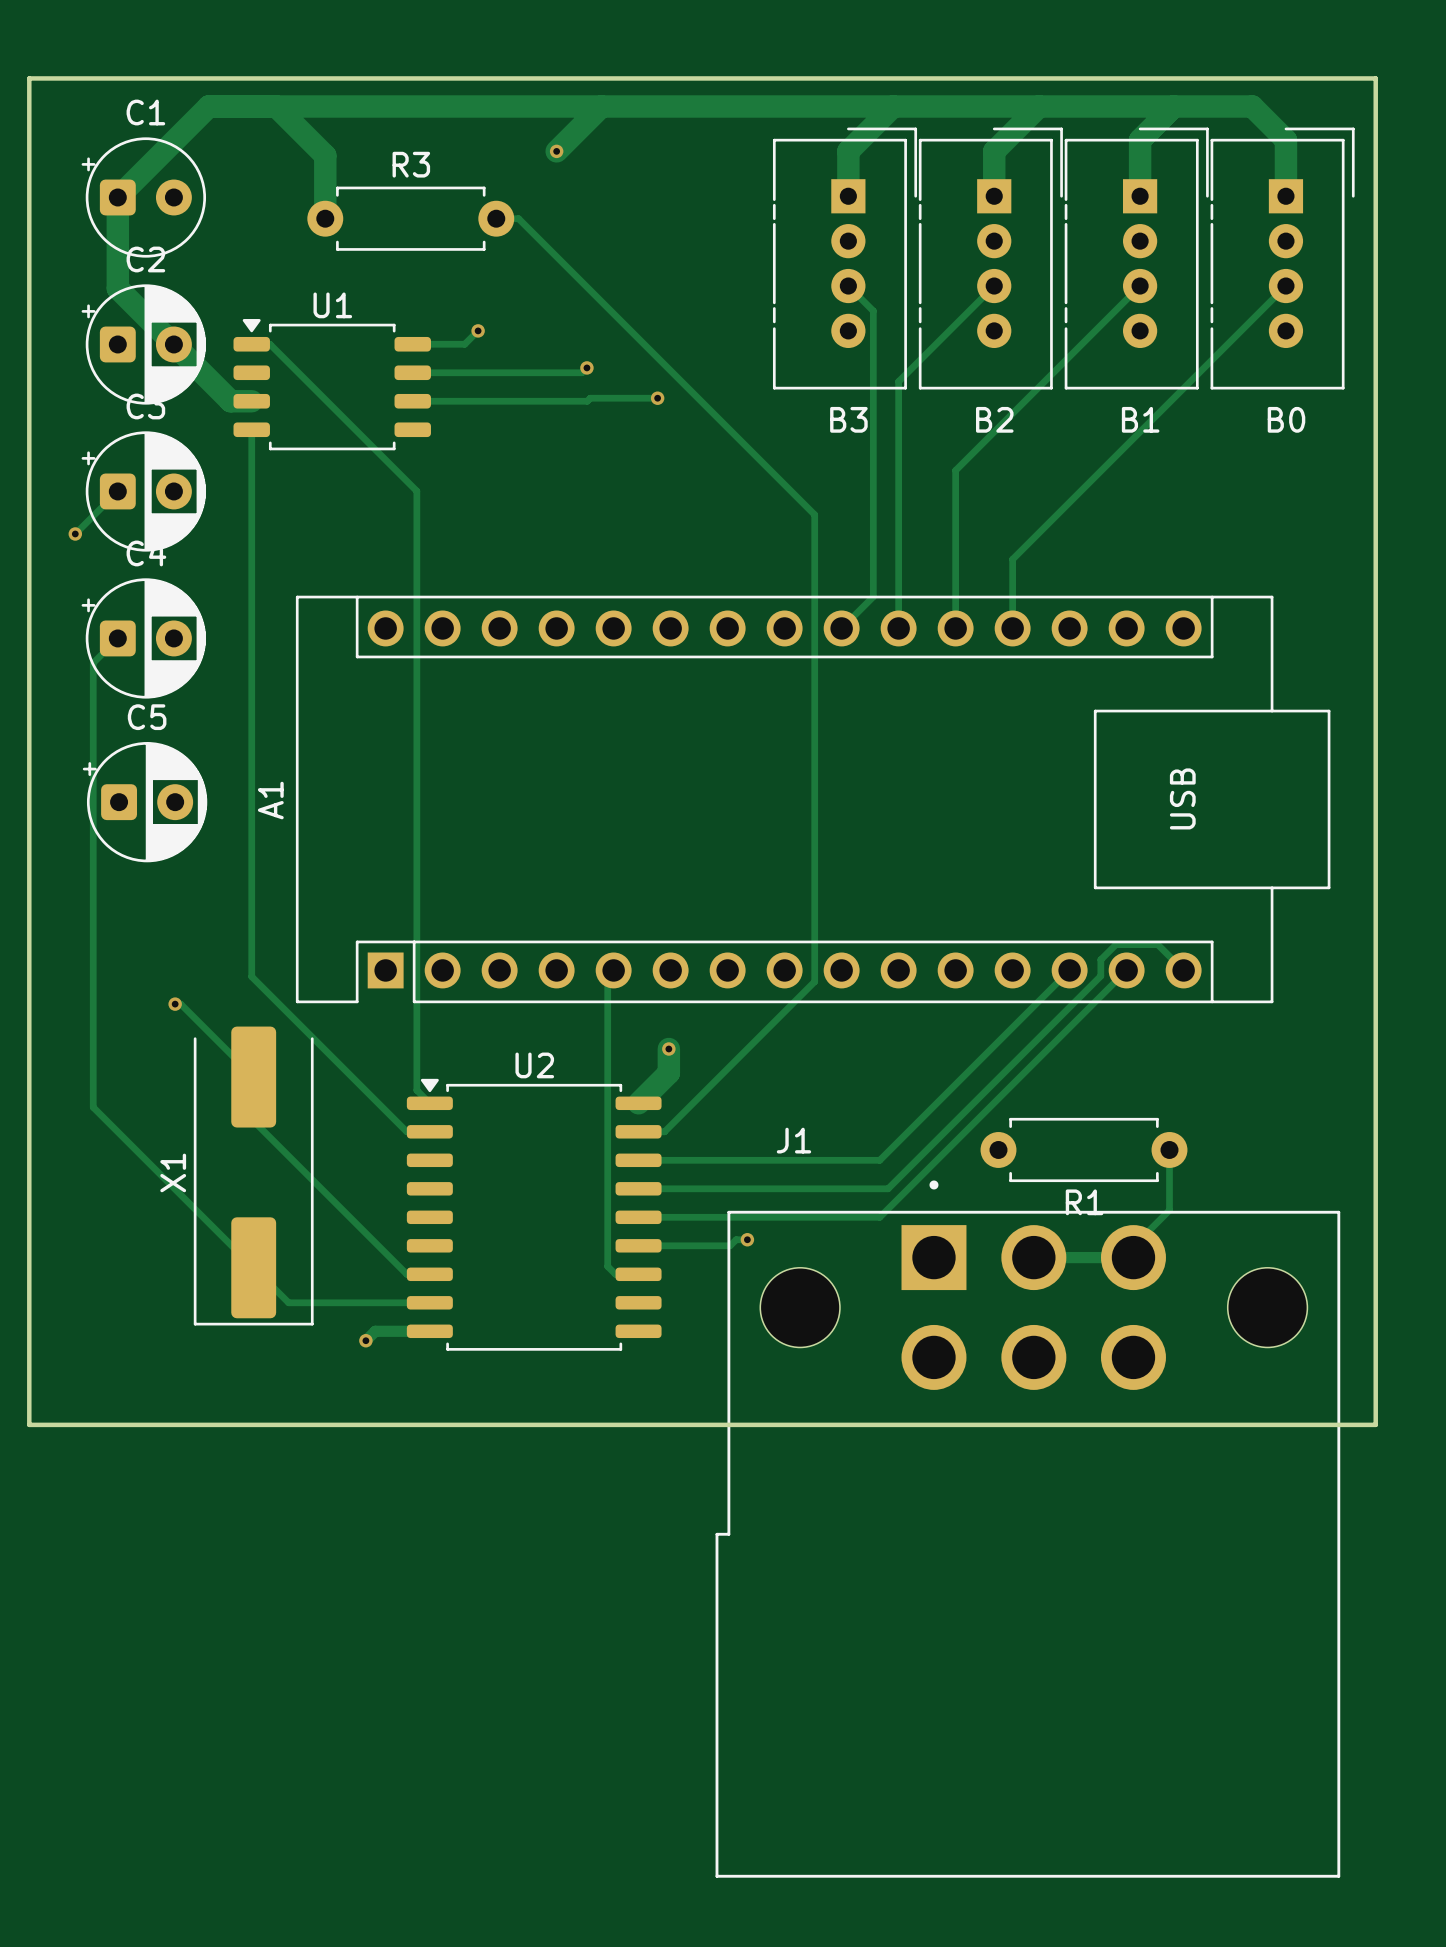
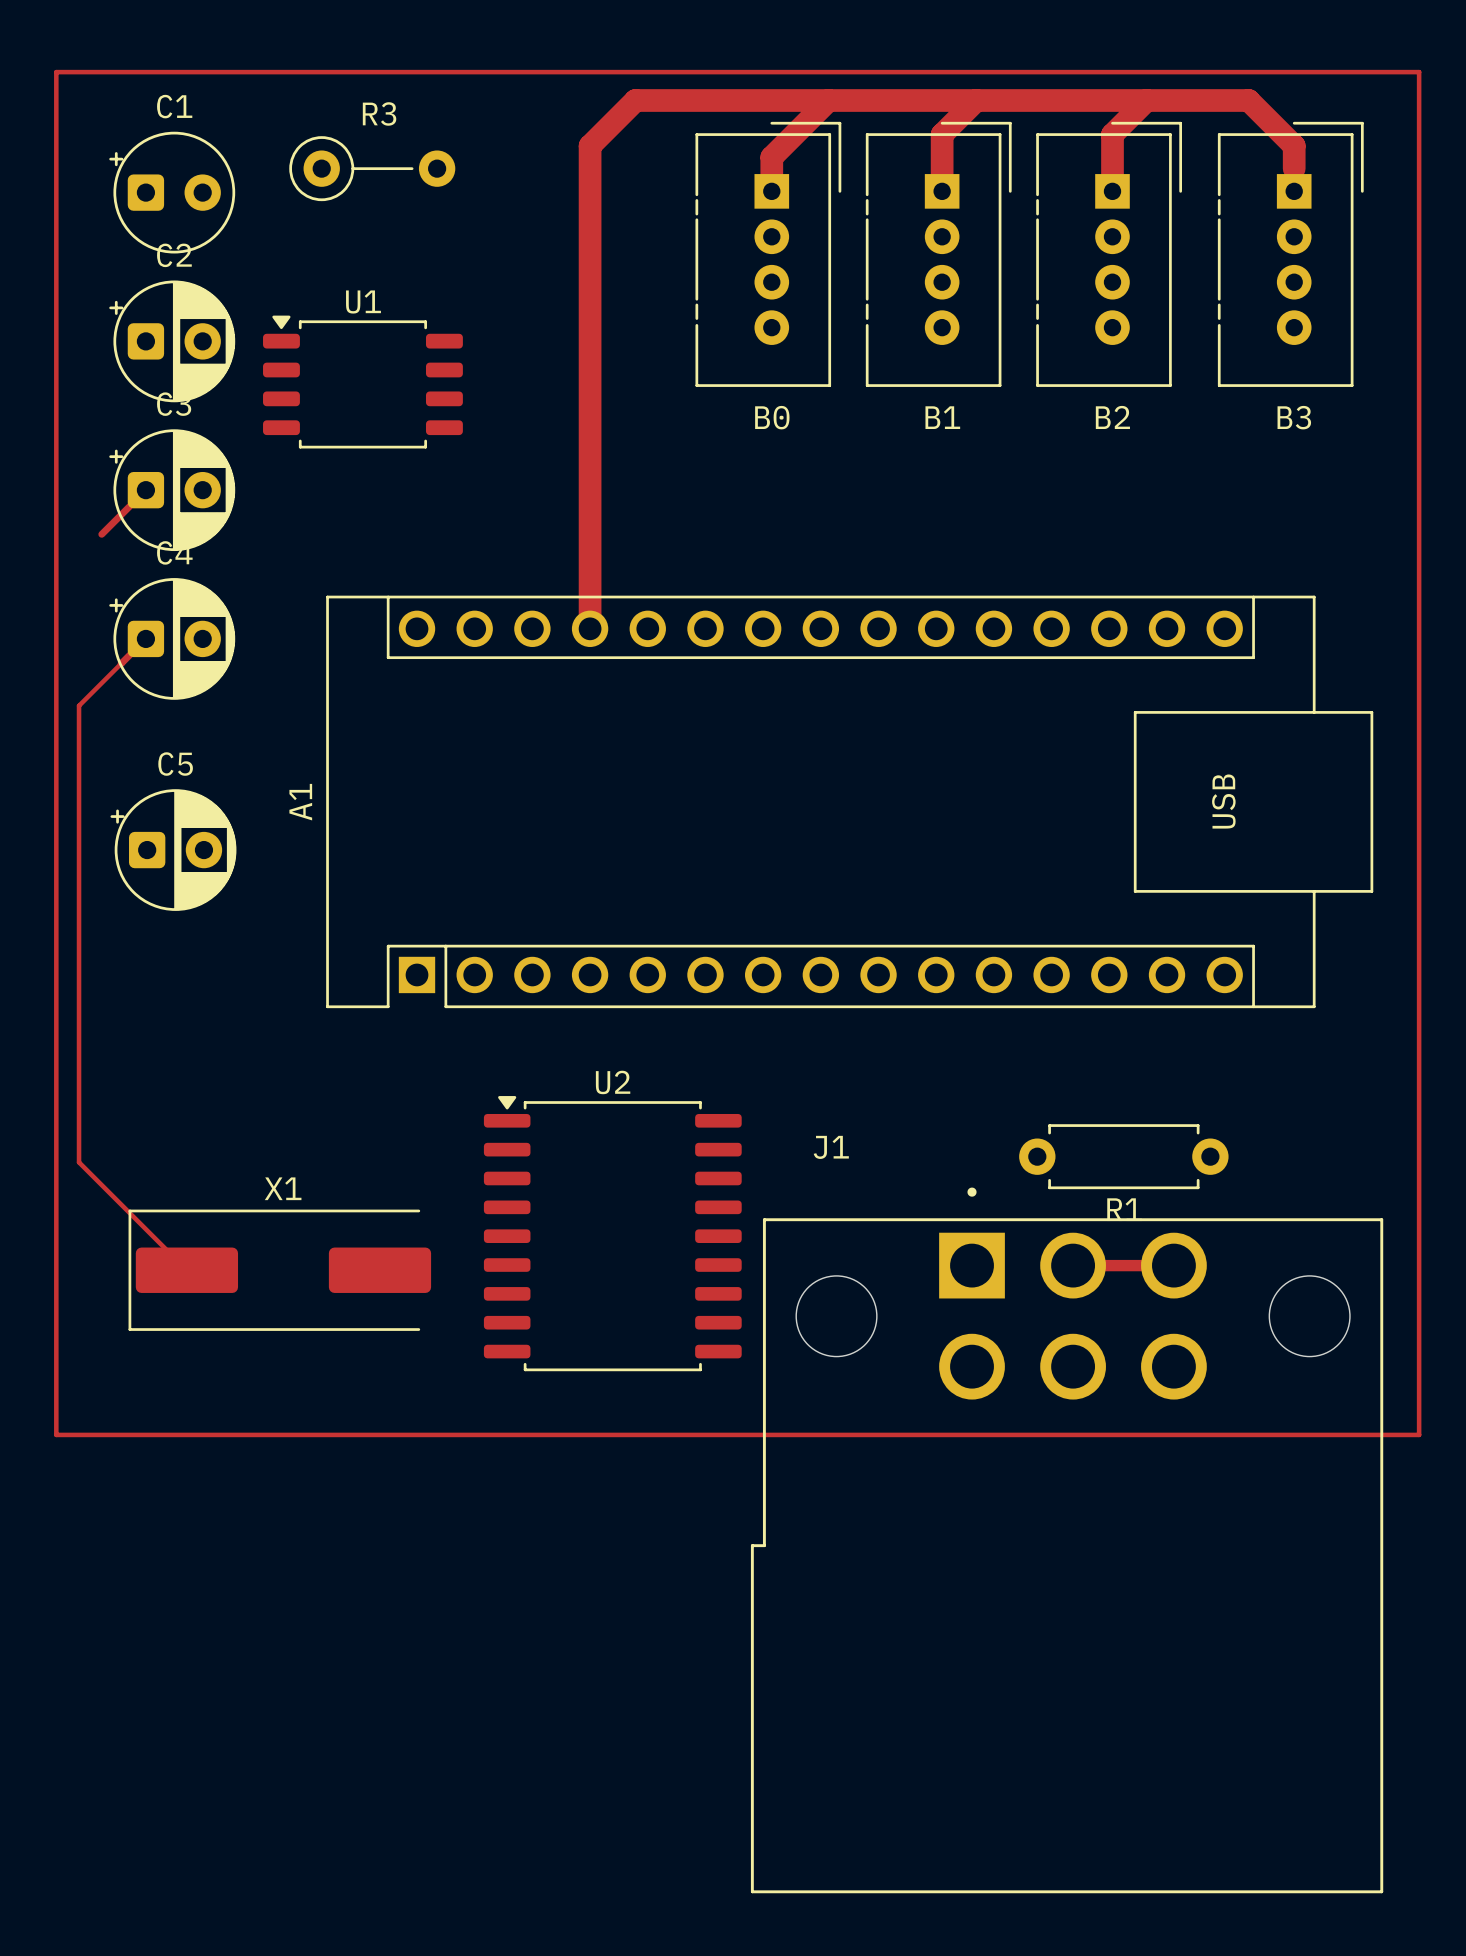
board edge: (29, 78) (1375, 78) (1375, 1424) (29, 1424) (29, 78) -> none
track: none -> (56, 72) (1419, 72) (1419, 1434) (56, 1434) (56, 72)
track: (276, 106) (325, 155) (325, 218) -> none
track: (601, 106) (208, 106) (117, 197) (117, 288) (230, 401) (251, 401) -> none
track: none -> (828, 100) (771, 157) (771, 191)
track: (893, 106) (848, 151) (848, 196) -> none
track: none -> (976, 100) (942, 134) (942, 191)
track: (1039, 106) (994, 151) (994, 196) -> none
track: (1173, 106) (1140, 140) (1140, 196) -> (1146, 100) (1112, 134) (1112, 191)
track: (1207, 106) (1252, 106) (1285, 140) (1285, 196) -> (1248, 100) (1294, 145) (1294, 168)
track: none -> (590, 145) (590, 628)
via: (556, 151) -> none
R3 footprint: [307, 186, 515, 251] -> [289, 136, 456, 202]
track: (496, 218) (518, 218) (814, 514) (814, 981) (664, 1131) (638, 1131) -> none
B3 position: (845, 258) -> (1290, 254)
B2 position: (990, 258) -> (1109, 254)
B1 position: (1136, 258) -> (938, 254)
B0 position: (1282, 258) -> (768, 254)
track: (848, 286) (873, 310) (873, 596) (841, 628) (841, 615) -> none
track: (994, 286) (898, 381) (898, 628) -> none
track: (1140, 286) (955, 470) (955, 628) -> none
track: (1285, 286) (1012, 559) (1012, 628) -> none
track: (478, 330) (464, 344) (412, 344) -> none
via: (478, 330) -> none
track: (251, 344) (269, 344) (416, 491) (416, 1090) (429, 1103) -> none
track: (586, 367) (582, 372) (412, 372) -> none
via: (586, 367) -> none
track: (657, 398) (590, 398) (587, 401) (412, 401) -> none
via: (657, 398) -> none
track: (251, 429) (251, 976) (406, 1131) (429, 1131) -> none
via: (75, 533) -> none
track: (93, 663) (93, 1107) (288, 1302) (429, 1302) -> (121, 663) (79, 705) (79, 1162) (186, 1270)
C5 position: (145, 802) -> (173, 850)
track: (613, 970) (607, 976) (607, 1266) (615, 1274) (638, 1274) -> none
track: (1069, 970) (879, 1160) (638, 1160) -> none
track: (1126, 970) (879, 1217) (638, 1217) -> none
track: (1183, 970) (1157, 944) (1115, 944) (1100, 959) (1100, 976) (888, 1188) (638, 1188) -> none
track: (175, 1004) (180, 1004) (253, 1077) (253, 1121) (406, 1274) (429, 1274) -> none
via: (175, 1004) -> none
track: (668, 1049) (668, 1073) (638, 1103) -> none
via: (668, 1049) -> none
track: (1169, 1149) (1169, 1210) (1133, 1246) (1133, 1257) (1135, 1255) -> none
X1 rotation: 0° (253, 1176) -> 90° clockwise (279, 1270)
U2 position: (534, 1214) -> (612, 1233)
track: (747, 1239) (736, 1239) (730, 1245) (638, 1245) -> none
via: (747, 1239) -> none
track: (429, 1331) (375, 1331) (365, 1340) -> none
via: (365, 1340) -> none

